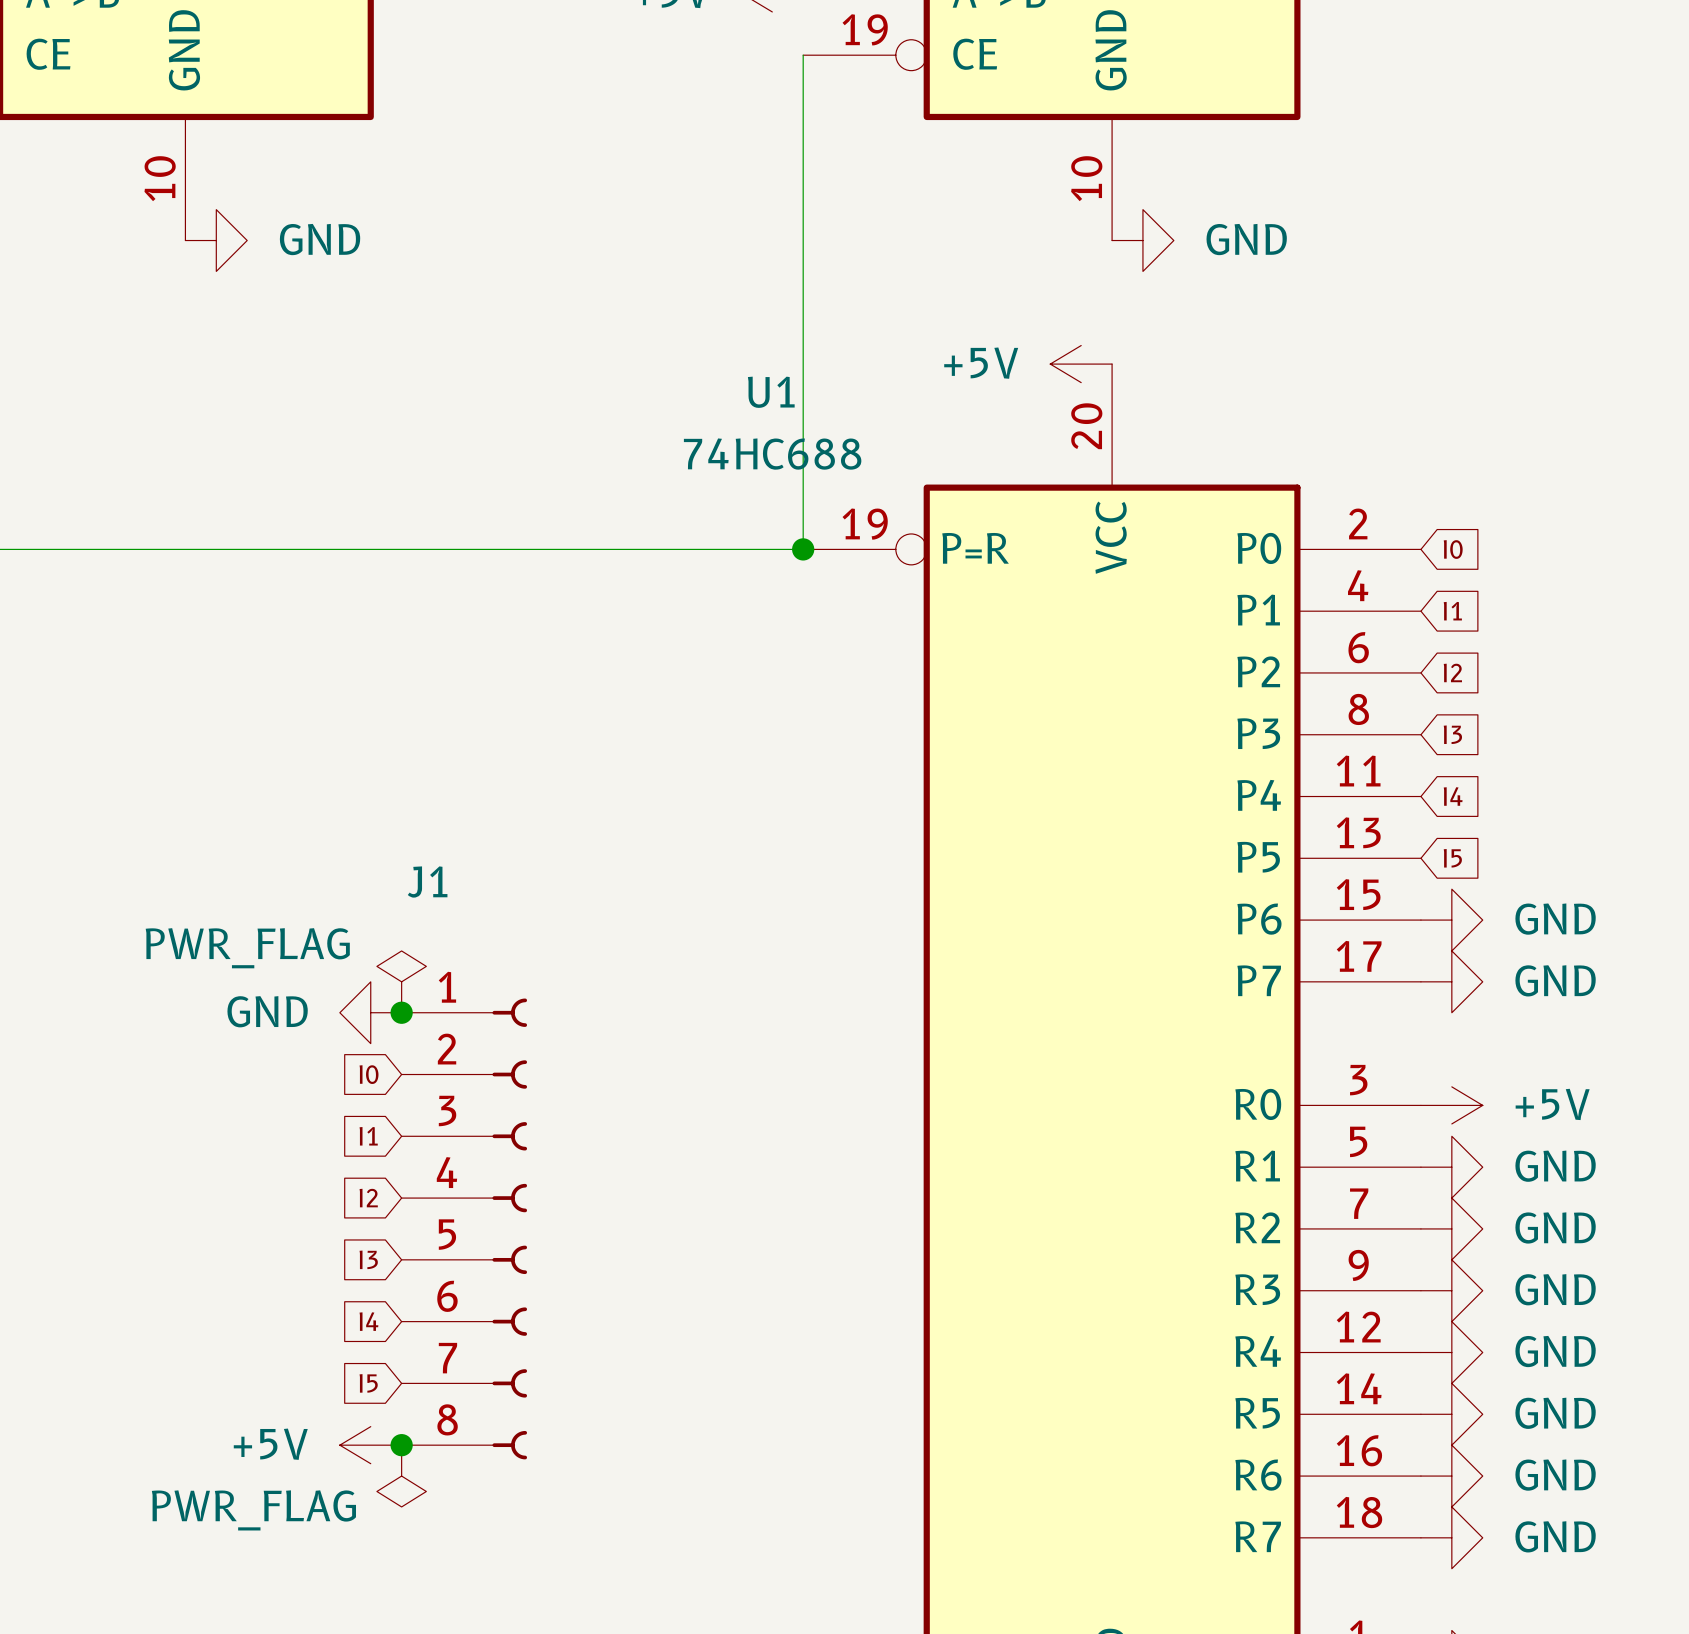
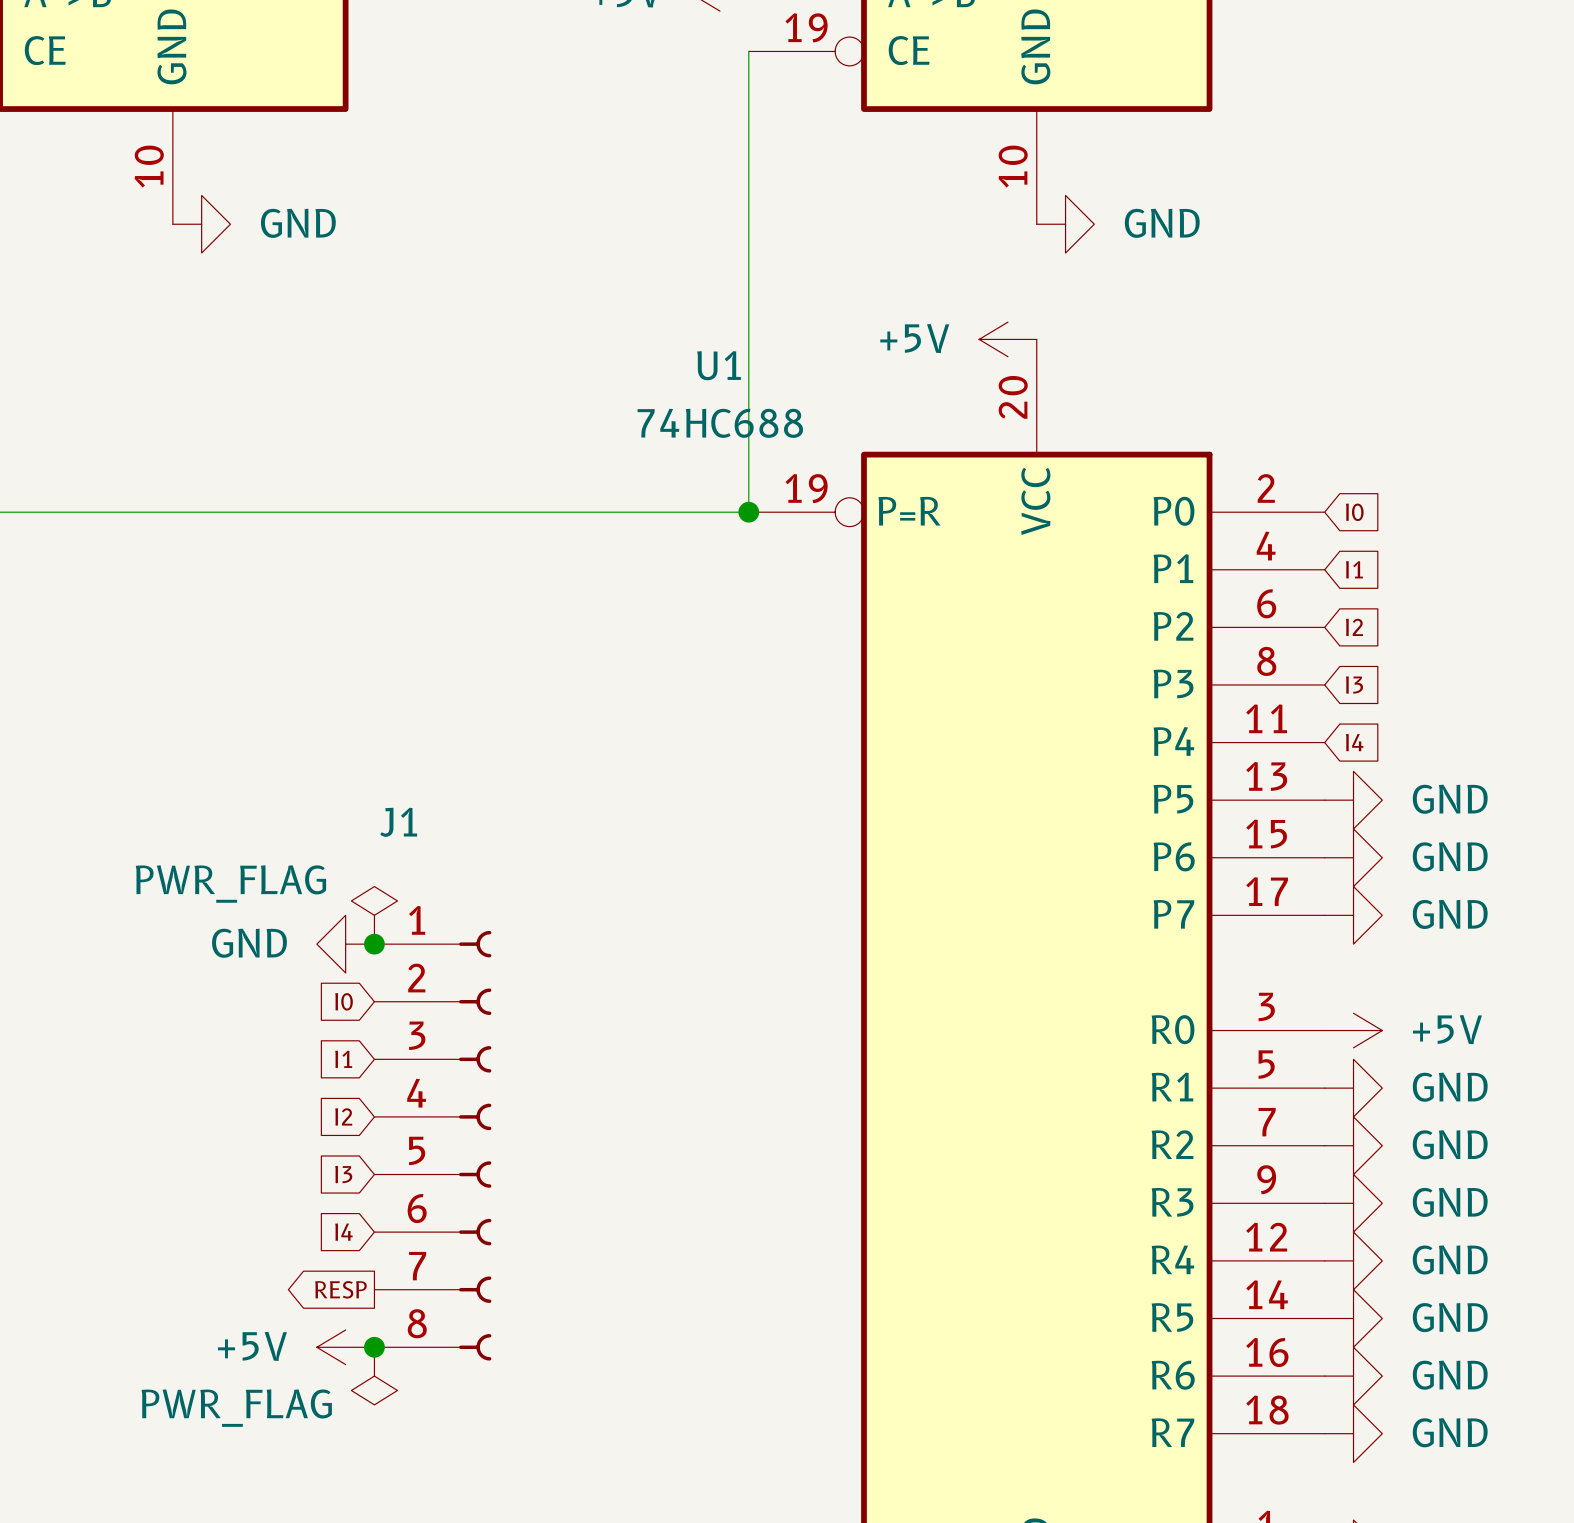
power symbol: none -> GND (1353, 800)
global label: I5 (1452, 858) -> none
global label shape: input (368, 1383) -> output (340, 1289)
global label: I5 (368, 1383) -> RESP (340, 1289)

